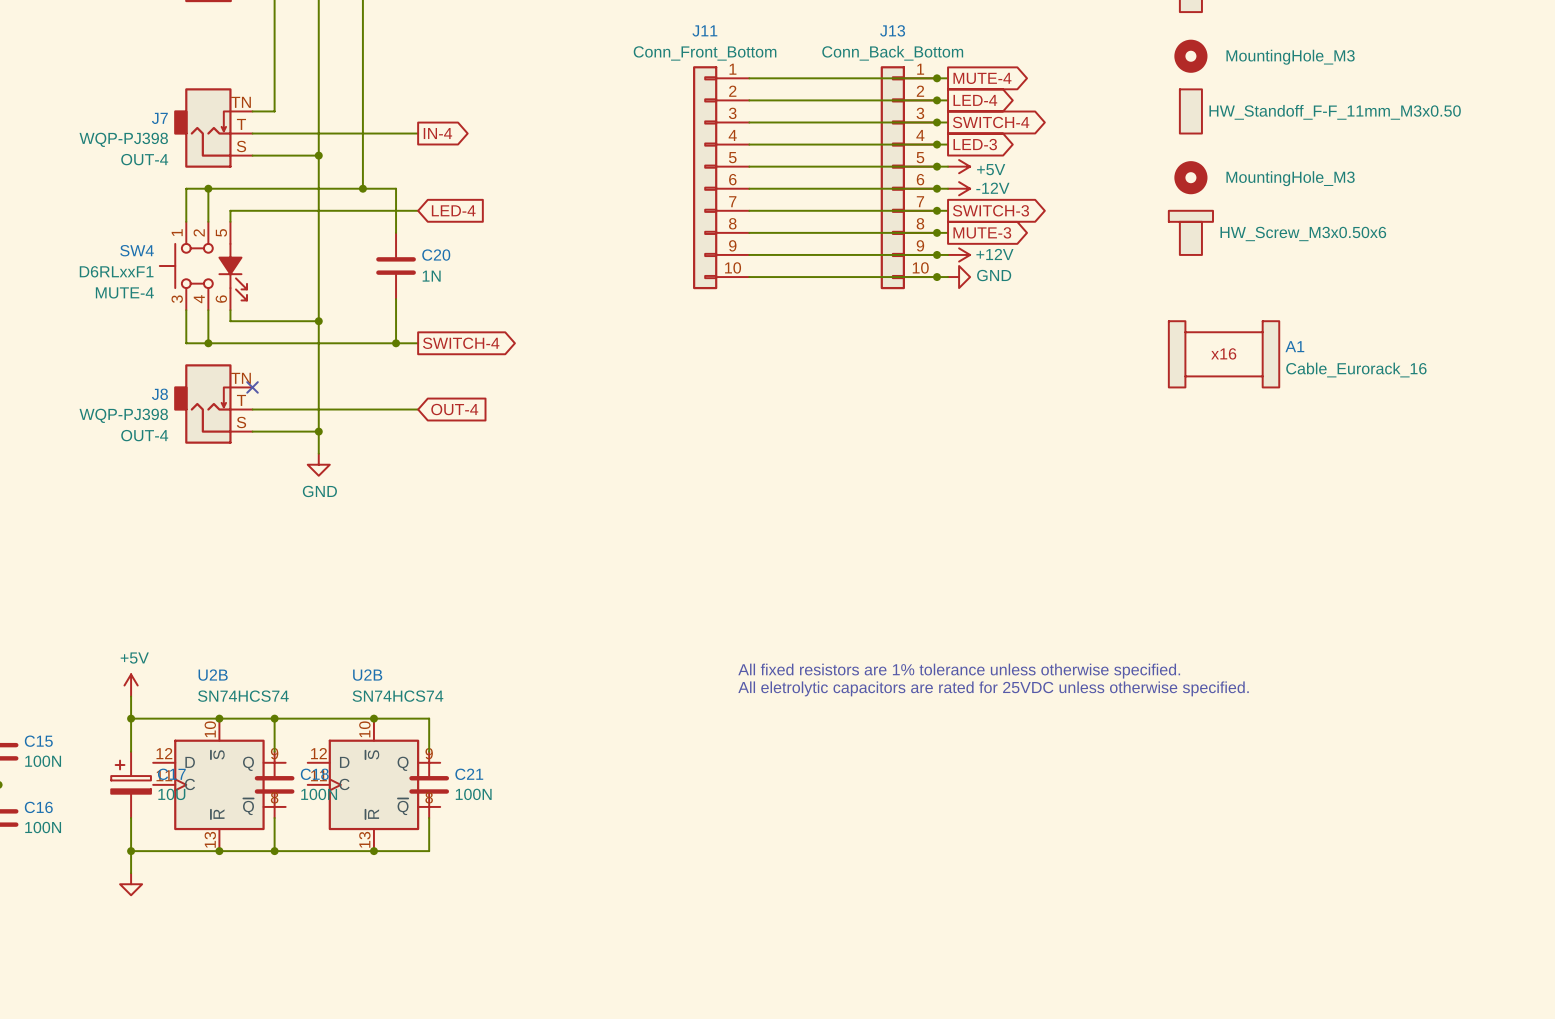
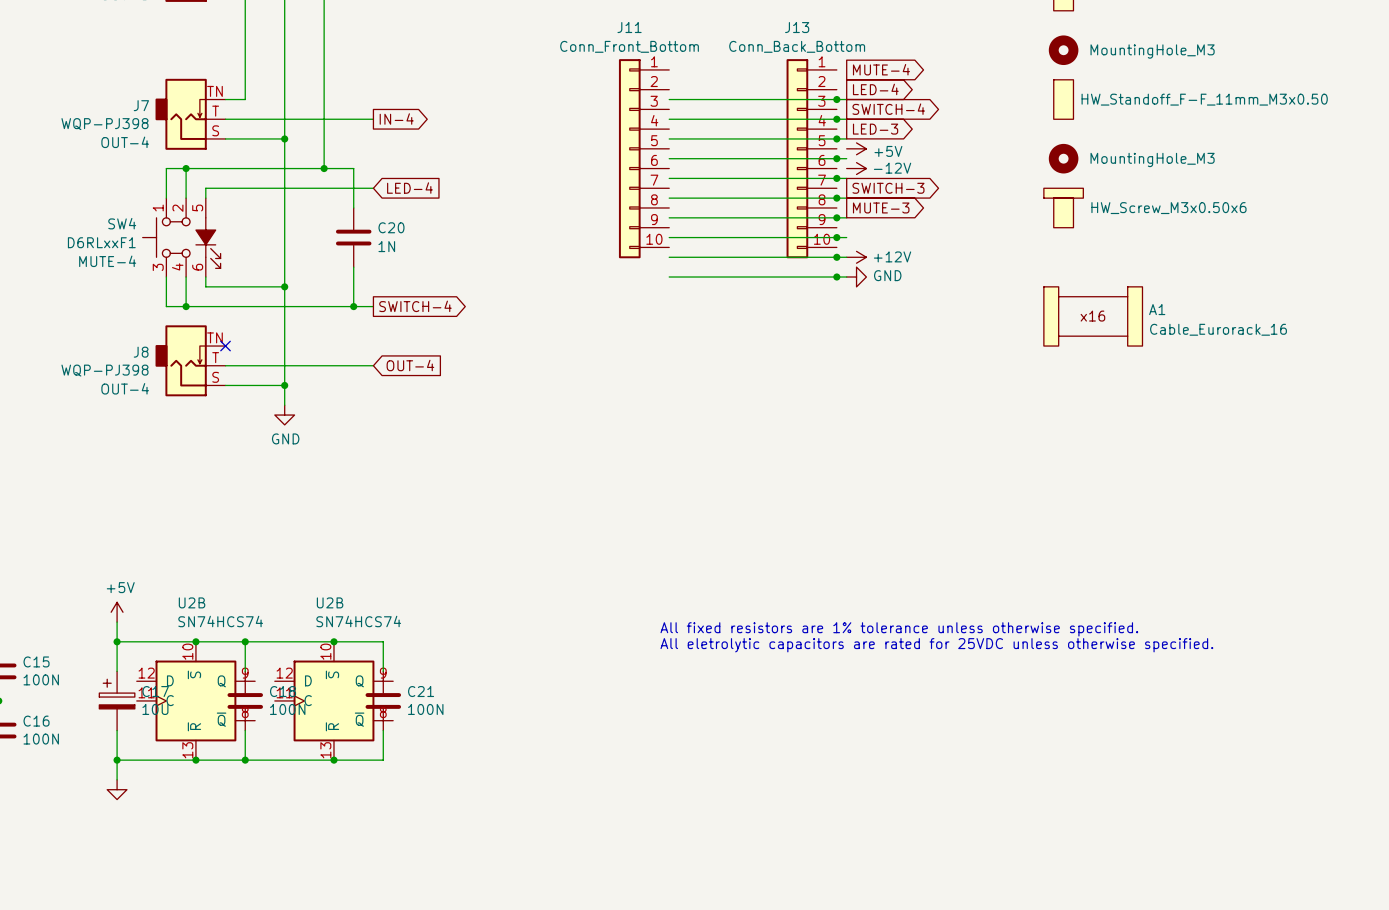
wire: (749, 78) (948, 78) -> (669, 99) (846, 99)
junction: (937, 78) -> none
wire: (749, 100) (948, 100) -> (669, 119) (846, 119)
junction: (937, 100) -> none
junction: none -> (836, 99)
wire: (749, 122) (948, 122) -> (669, 138) (846, 138)
junction: (937, 122) -> none
junction: none -> (836, 119)
wire: (749, 144) (948, 144) -> (669, 158) (846, 158)
junction: (937, 144) -> none
junction: none -> (836, 138)
wire: (749, 166) (948, 166) -> (669, 178) (846, 178)
junction: (937, 166) -> none
junction: none -> (836, 158)
wire: (749, 188) (948, 188) -> (669, 198) (846, 198)
junction: (937, 188) -> none
junction: none -> (836, 178)
wire: (749, 210) (948, 210) -> (669, 217) (846, 217)
junction: (937, 210) -> none
junction: none -> (836, 198)
wire: (749, 232) (948, 232) -> (669, 237) (846, 237)
junction: (937, 232) -> none
junction: none -> (836, 217)
wire: (749, 254) (948, 254) -> (669, 257) (846, 257)
junction: (937, 254) -> none
power symbol position: +12V (959, 254) -> +12V (856, 257)
junction: none -> (836, 237)
wire: (749, 277) (948, 277) -> (669, 277) (846, 277)
junction: (937, 277) -> none
power symbol position: GND (959, 277) -> GND (856, 277)
junction: none -> (836, 257)
junction: none -> (836, 277)
text position: All fixed resistors are 1% tolerance unless otherwise specified. (959, 671) -> All fixed resistors are 1% tolerance unless otherwise specified. (899, 629)
text position: All eletrolytic capacitors are rated for 25VDC unless otherwise specified. (993, 688) -> All eletrolytic capacitors are rated for 25VDC unless otherwise specified. (936, 645)

